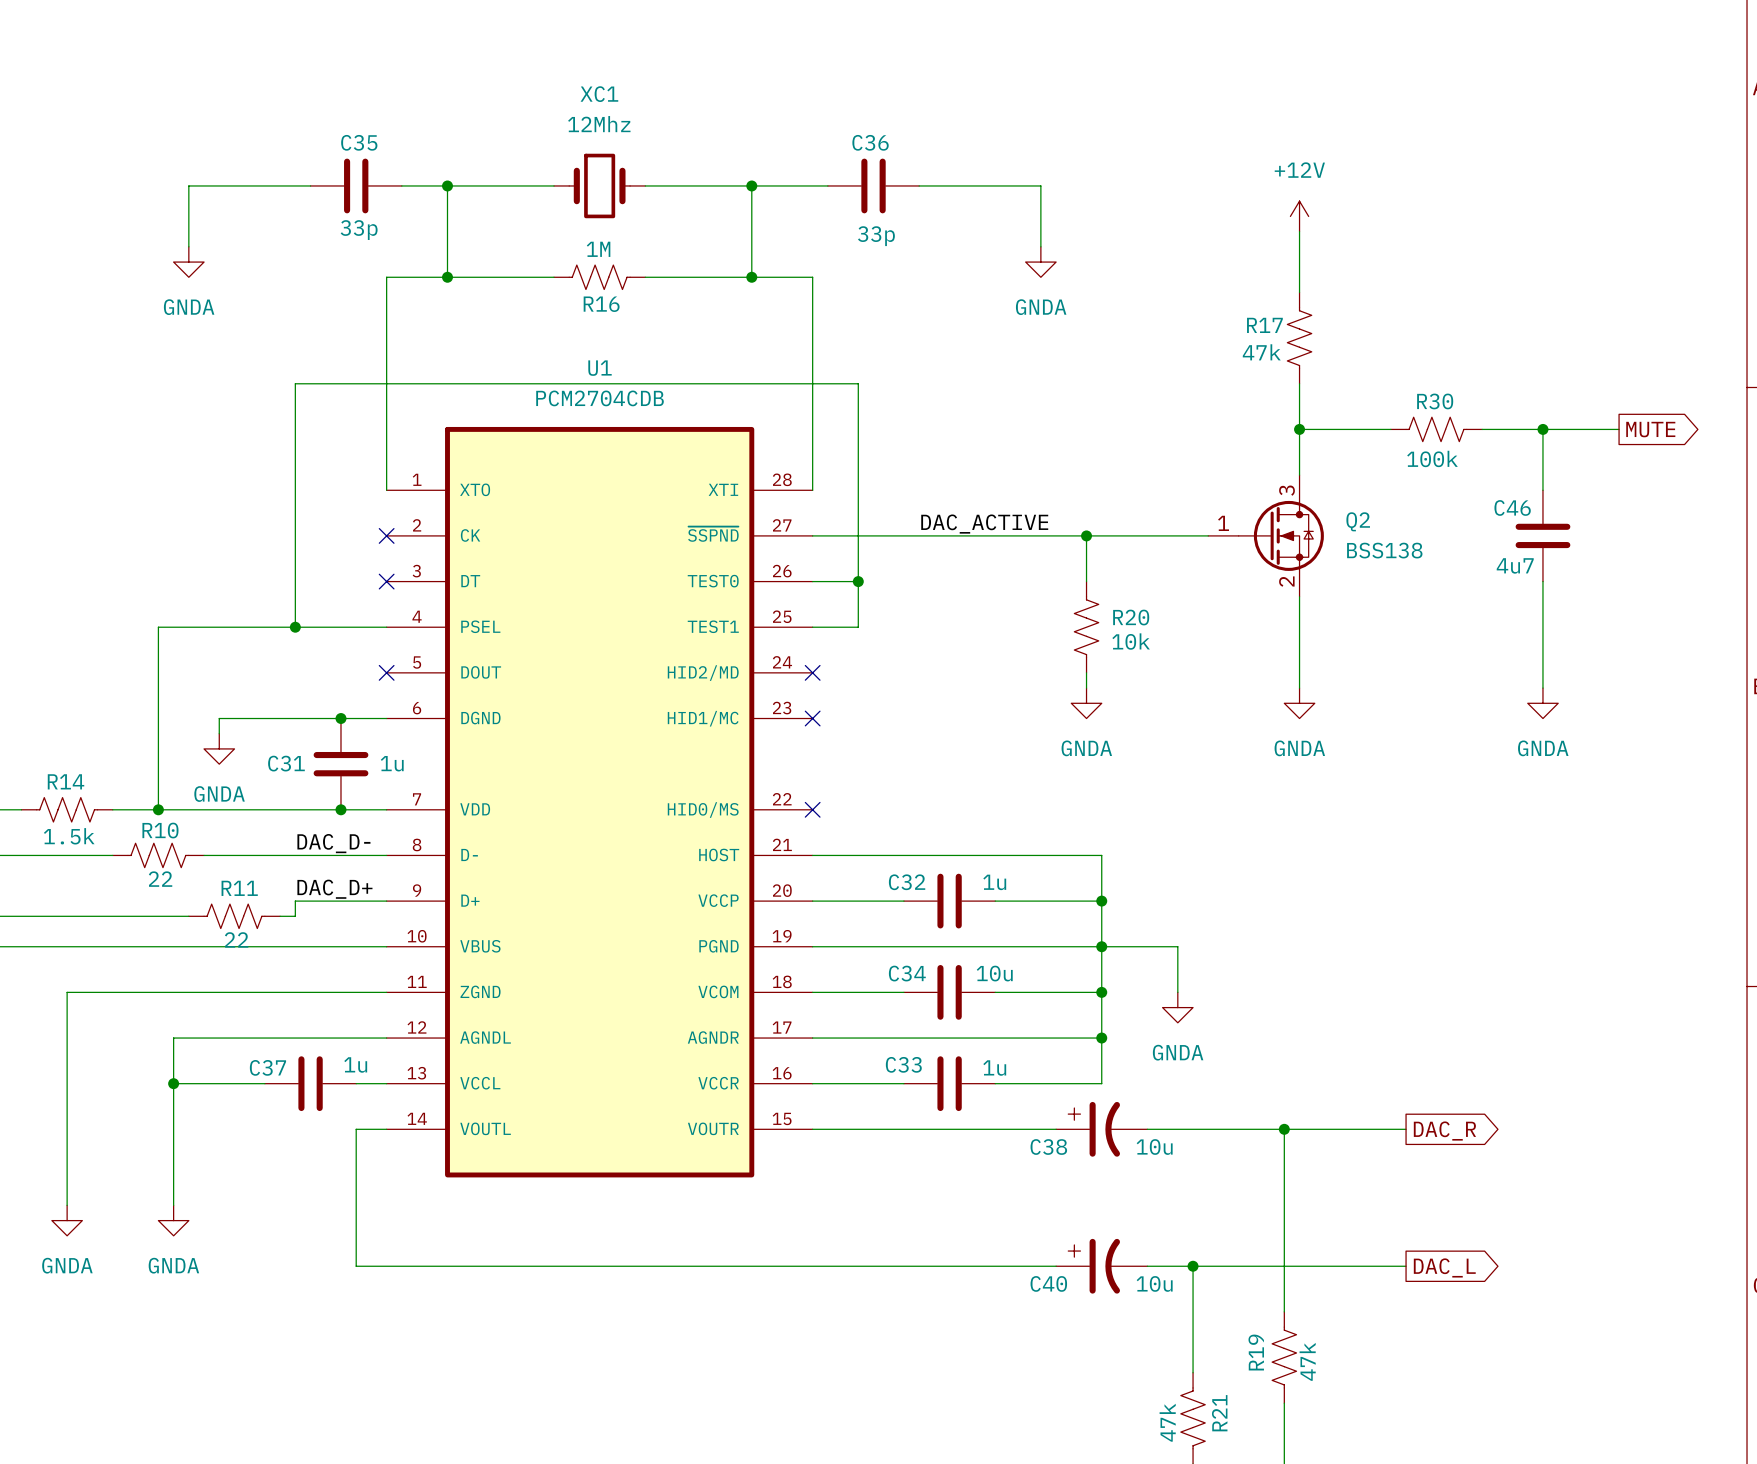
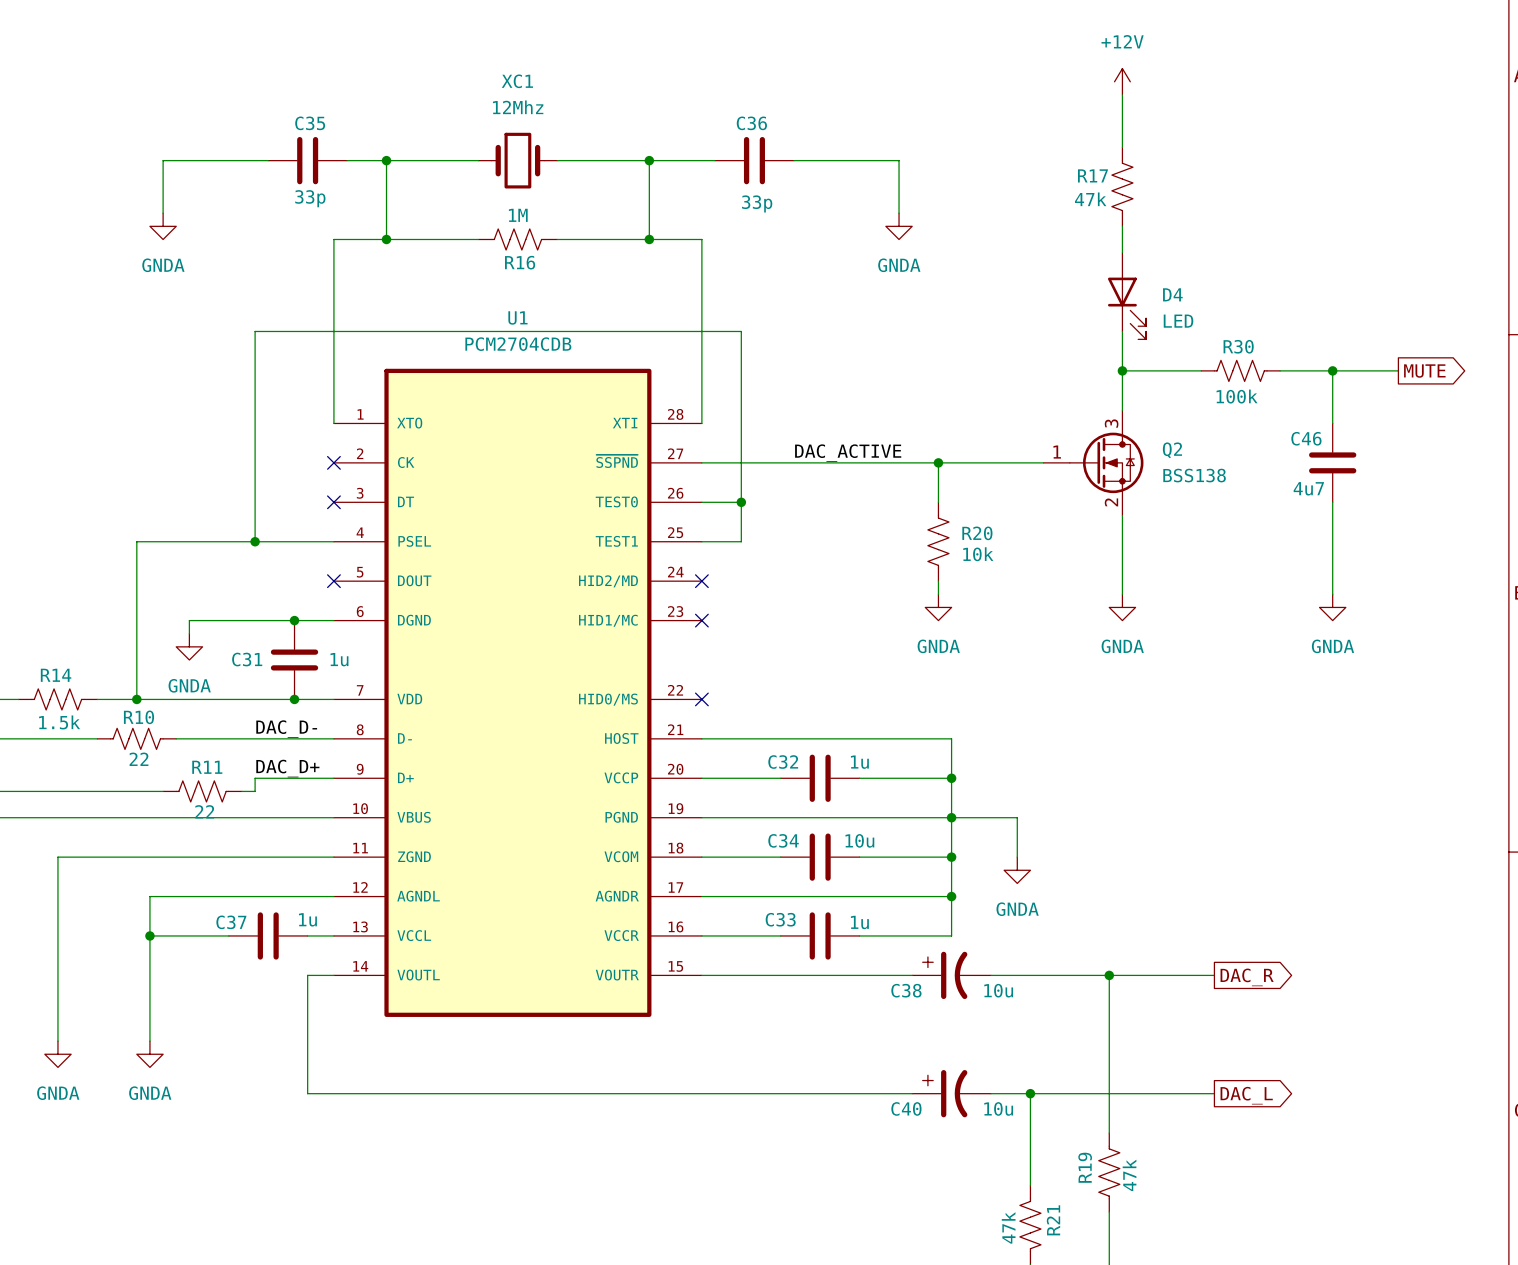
wire: none -> (1122, 94) (1122, 147)
power symbol position: +12V (1299, 216) -> +12V (1122, 81)
R17 position: (1299, 338) -> (1122, 186)
D4: none -> LED (1127, 295)

